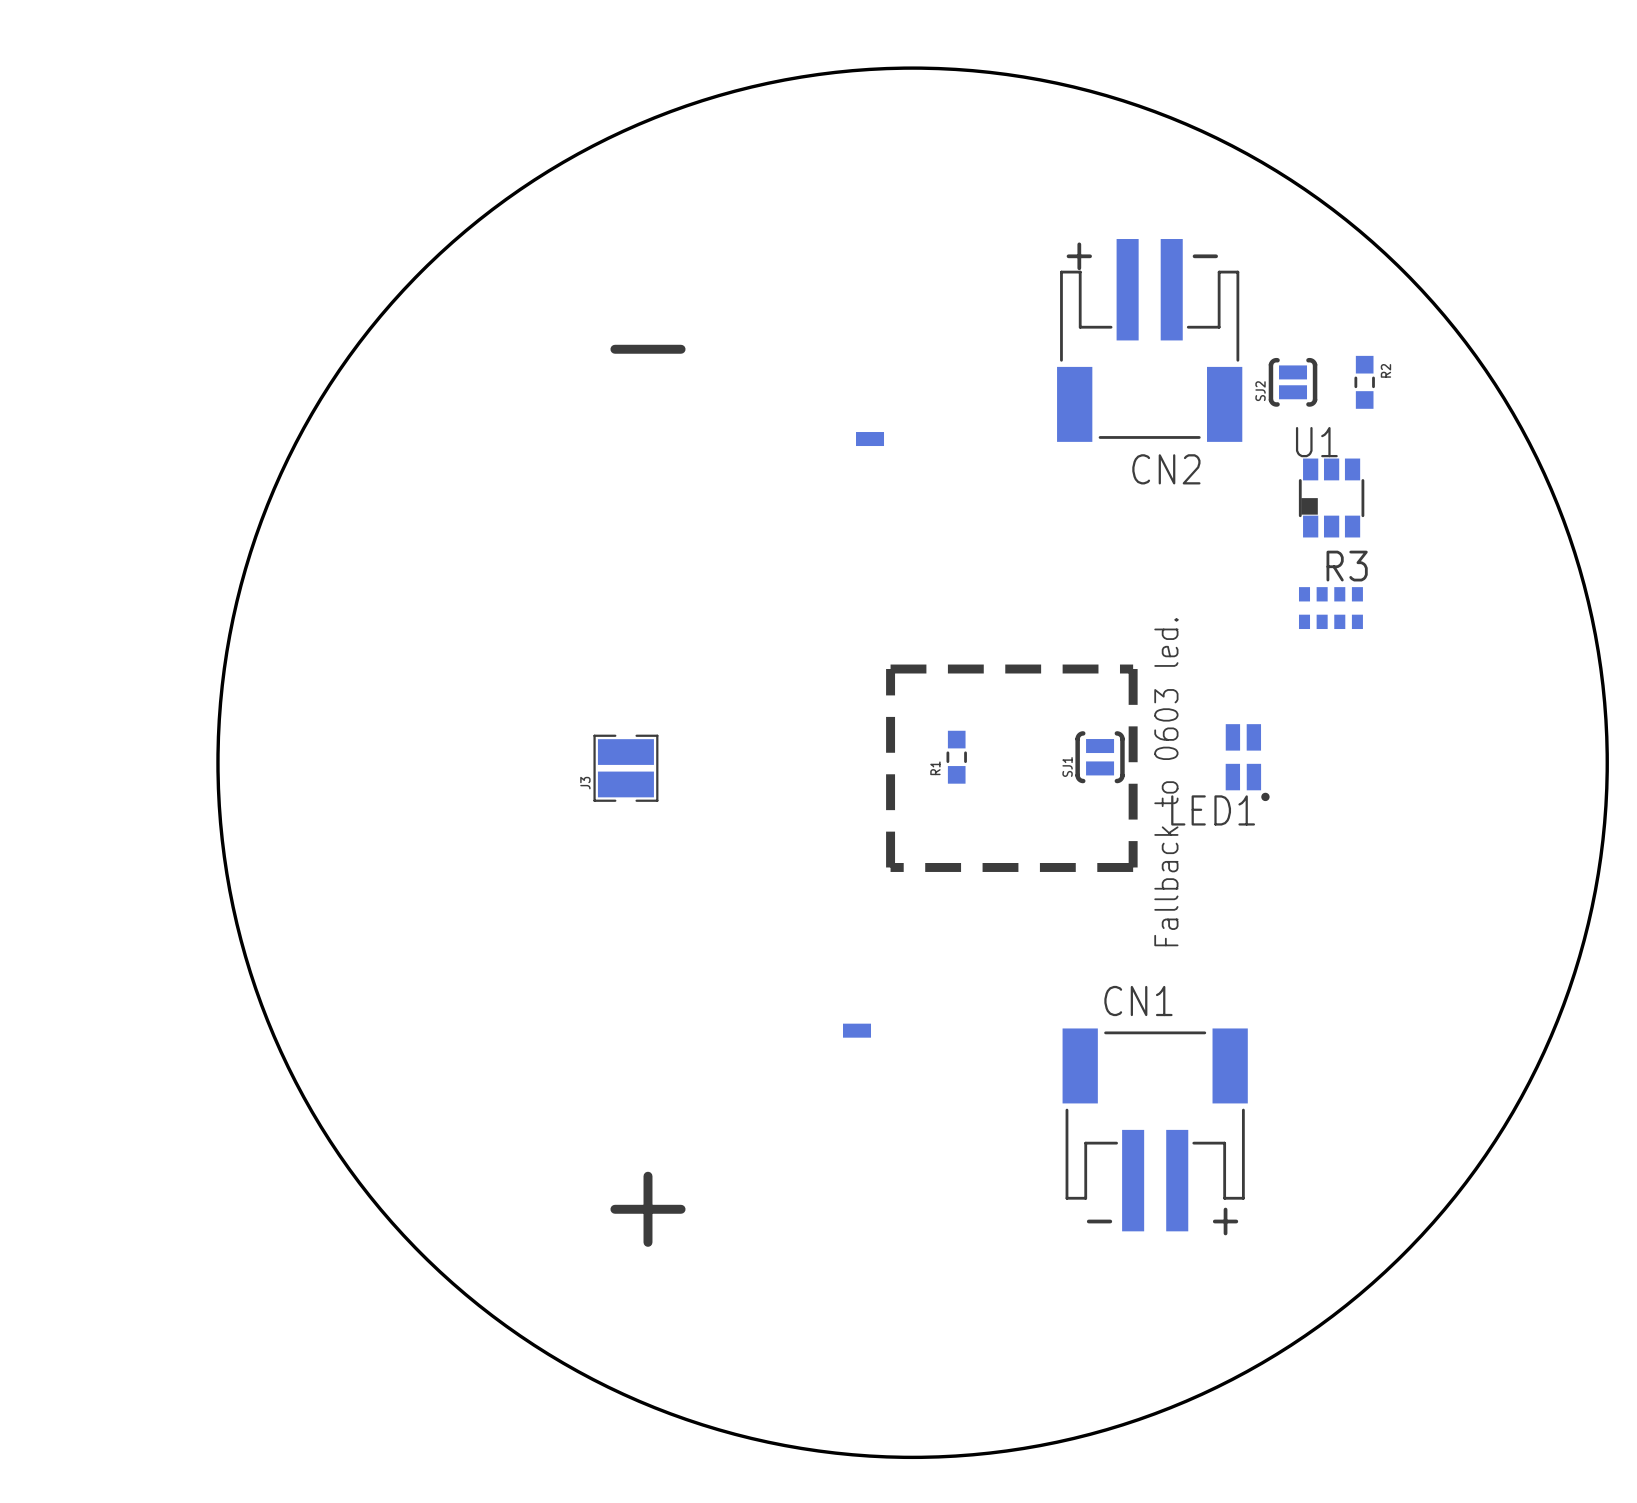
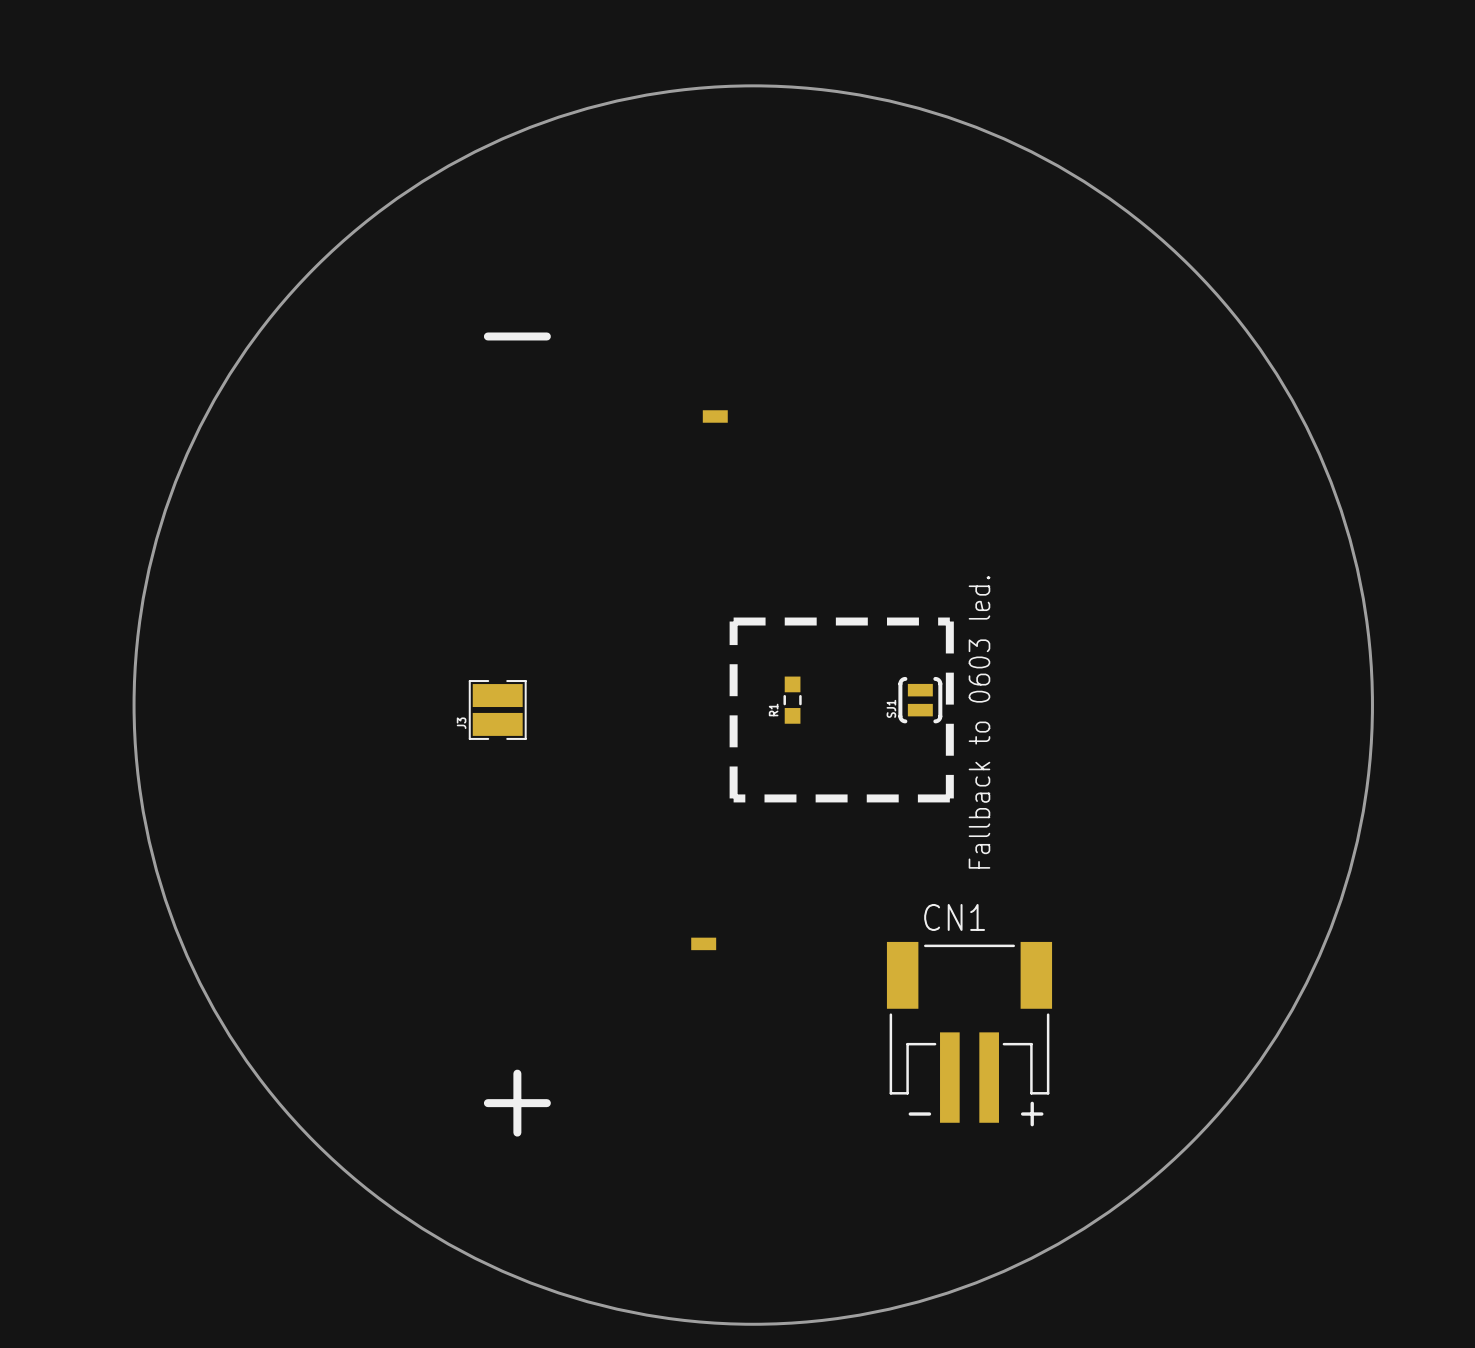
CN2: (1149, 340) -> none
SJ2: (1293, 382) -> none
R2: (1364, 382) -> none
U1: (1331, 498) -> none
R3: (1330, 608) -> none
LED1: (1243, 757) -> none
drawing: [1261, 792, 1270, 802] -> none

